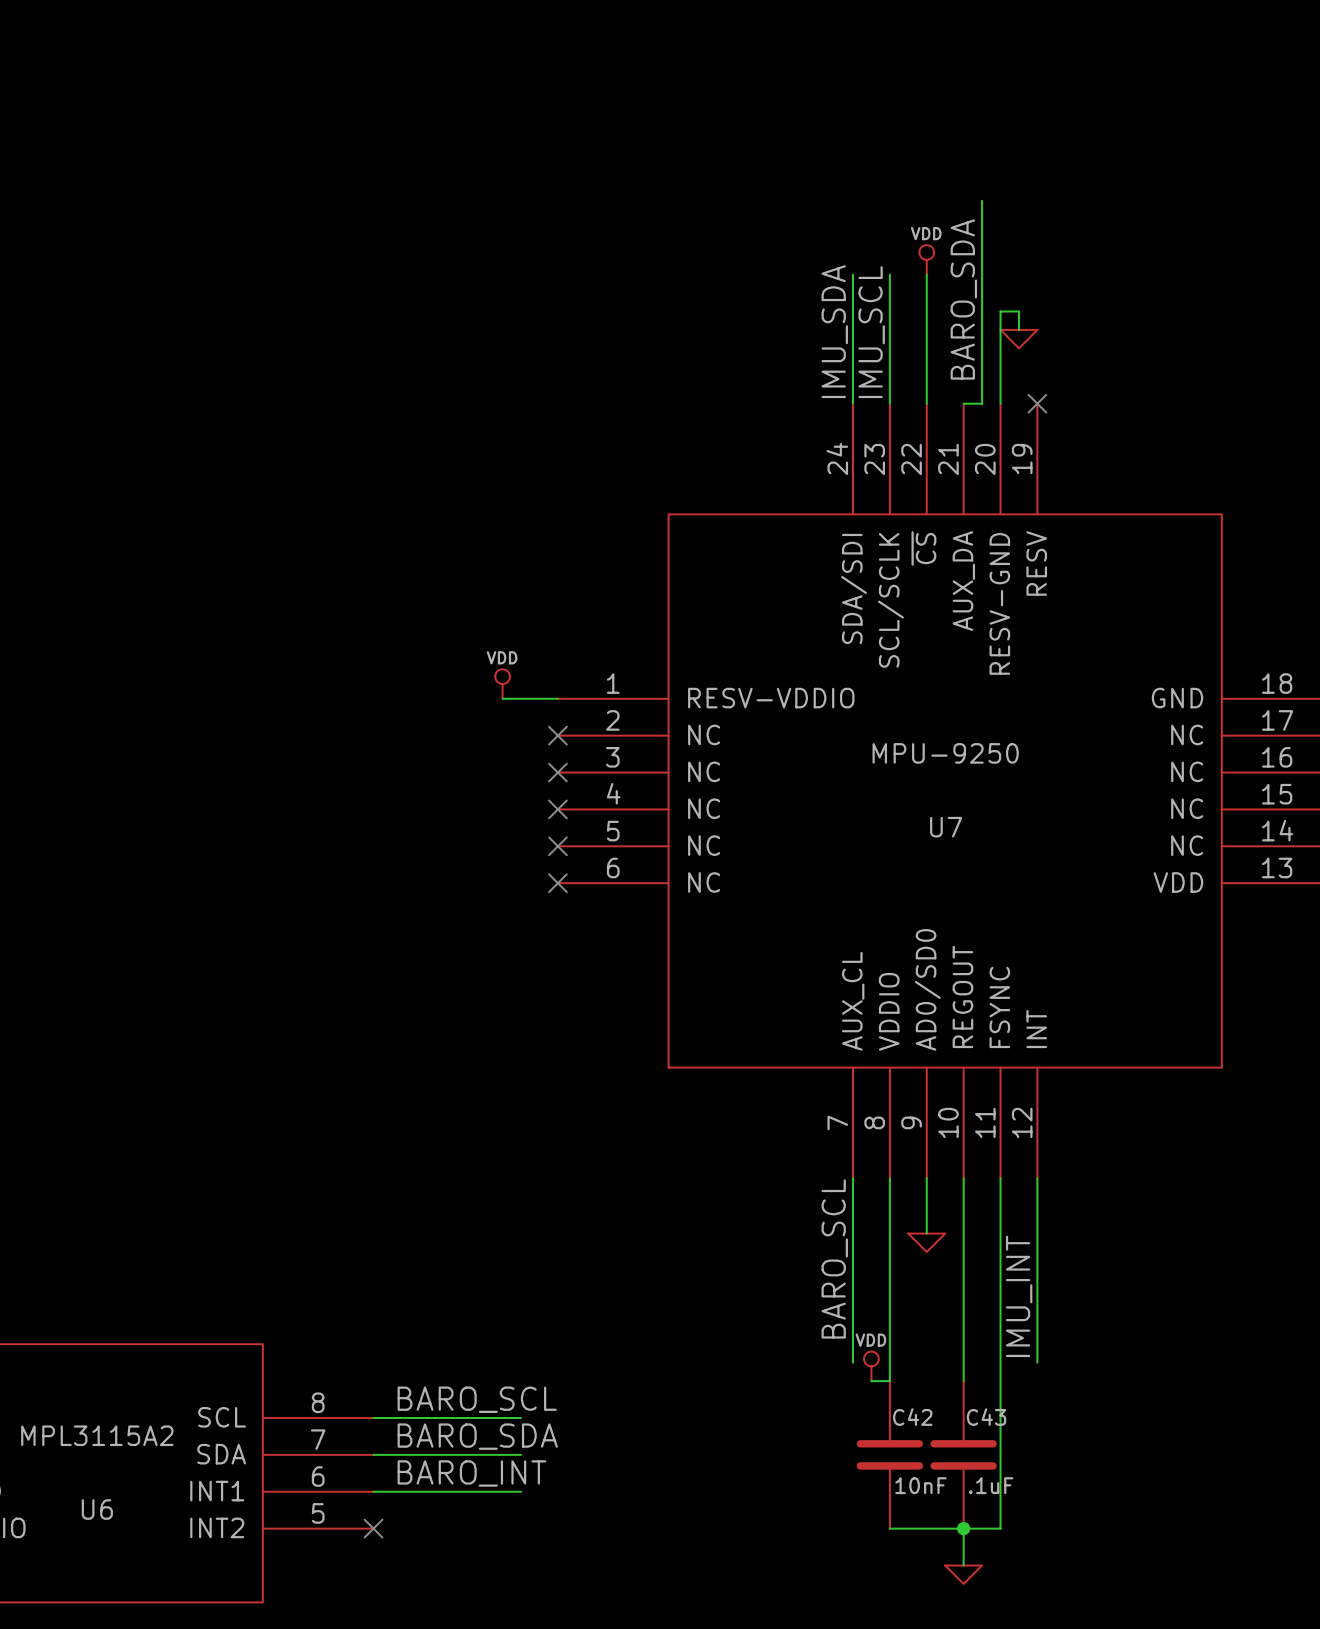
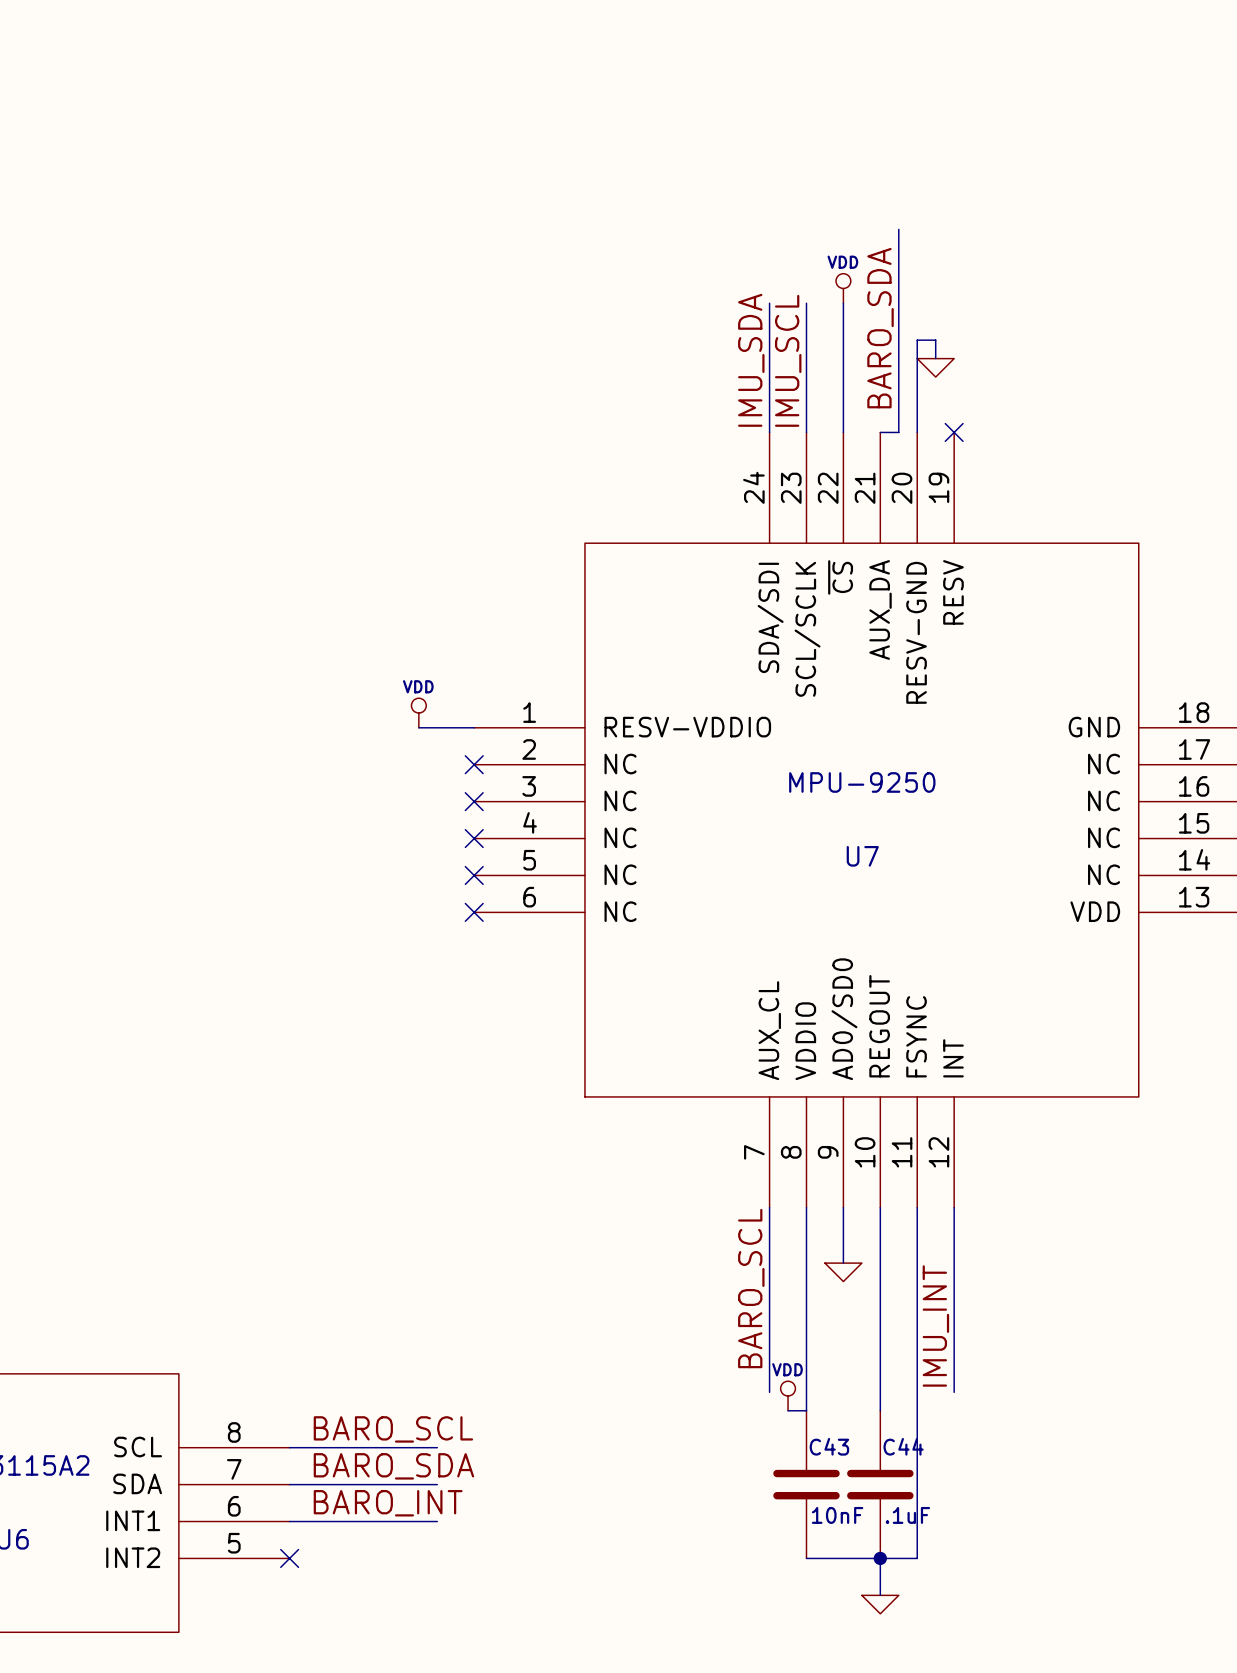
C42 name: C42 (912, 1417) -> C43 (829, 1446)
C43 name: C43 (986, 1417) -> C44 (903, 1446)

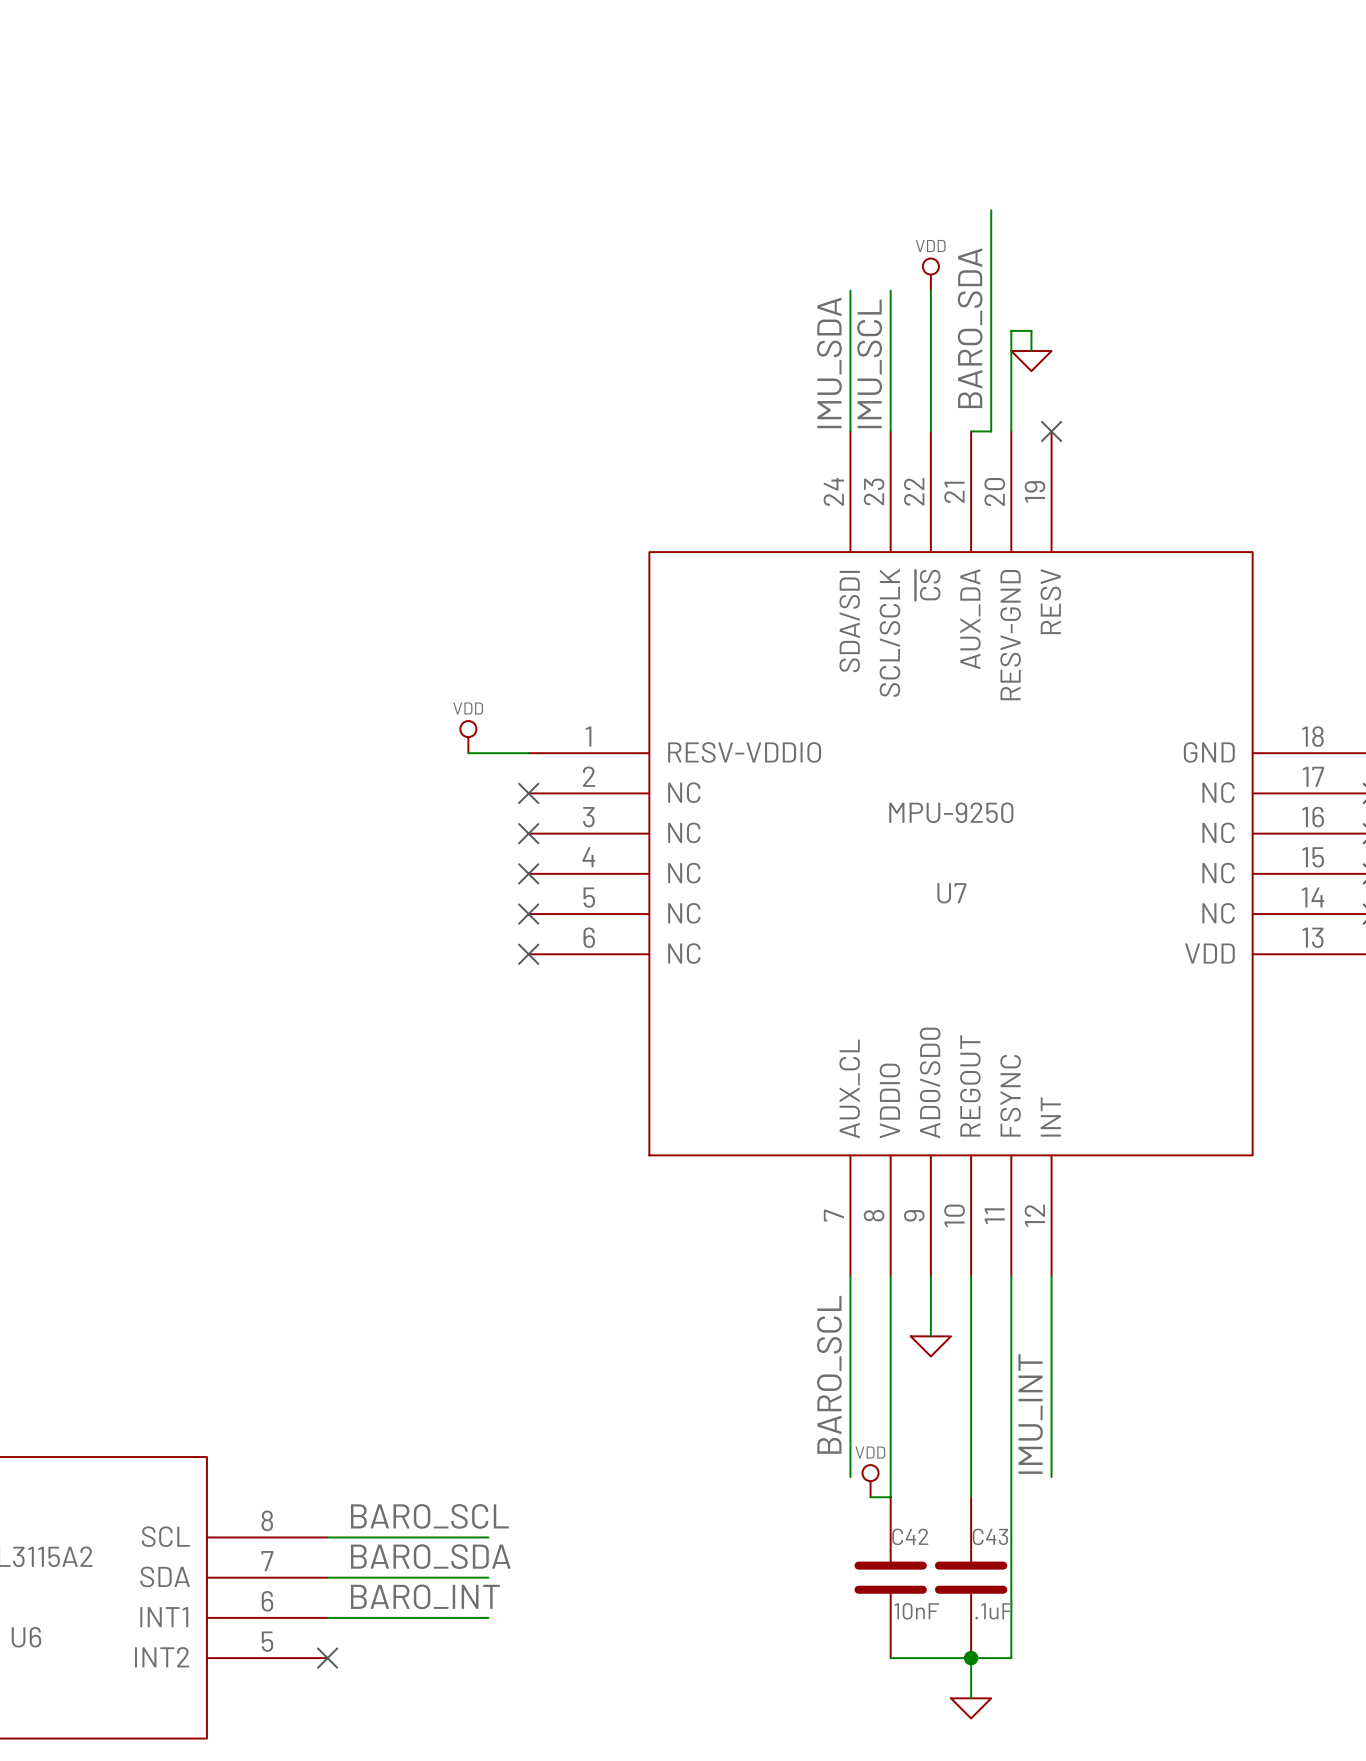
C43 name: C43 (829, 1446) -> C42 (910, 1536)
C44 name: C44 (903, 1446) -> C43 (990, 1536)

